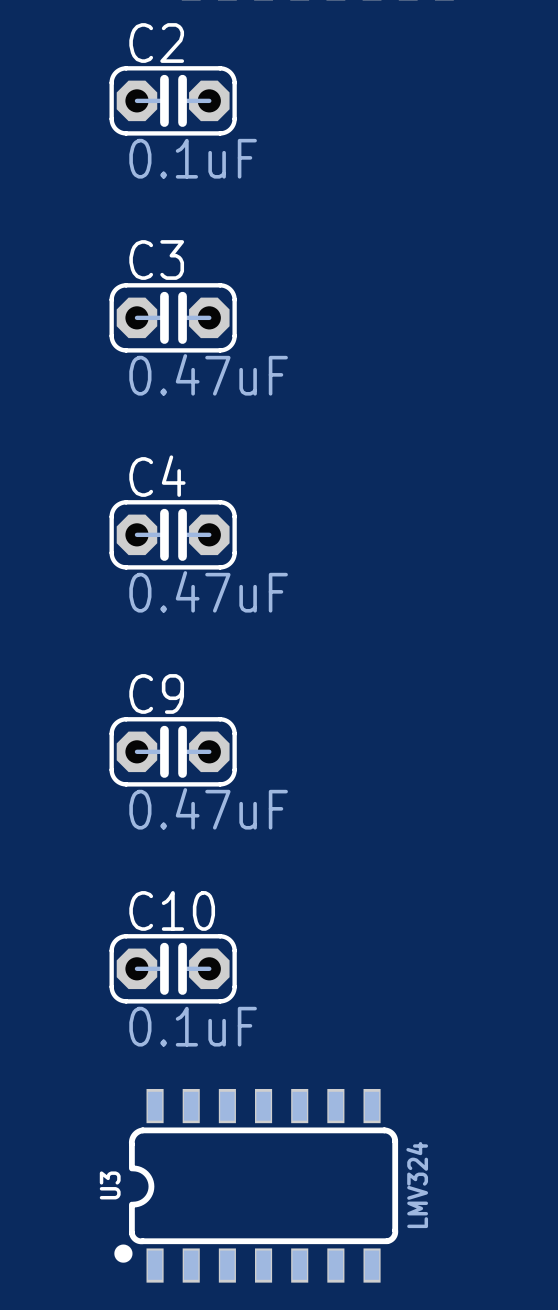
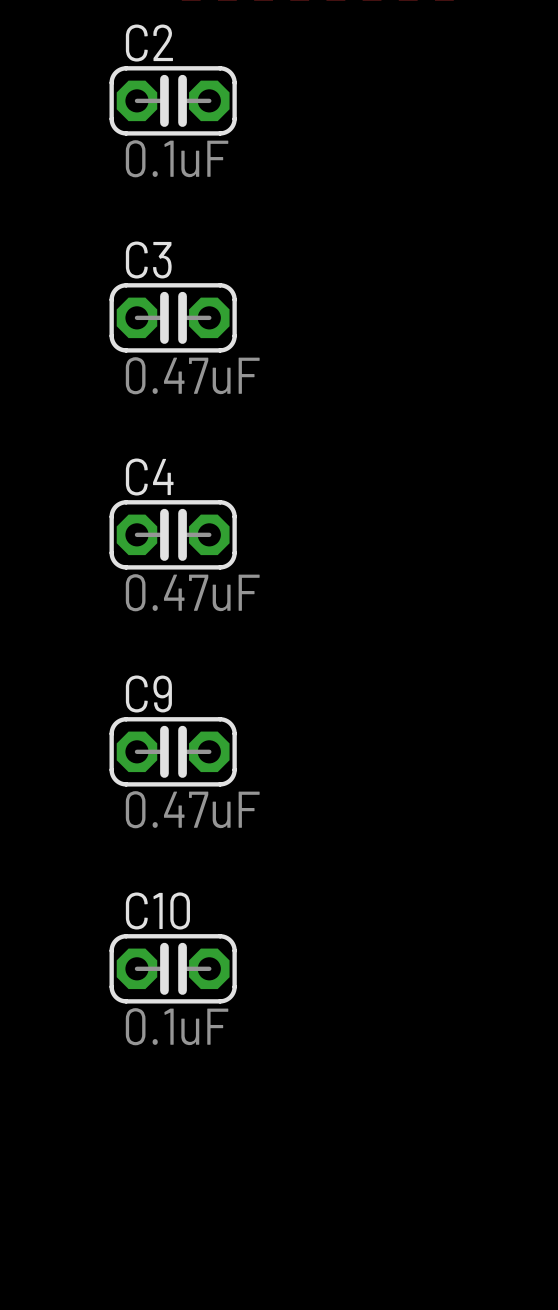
U3: LMV324 (256, 1185) -> none

